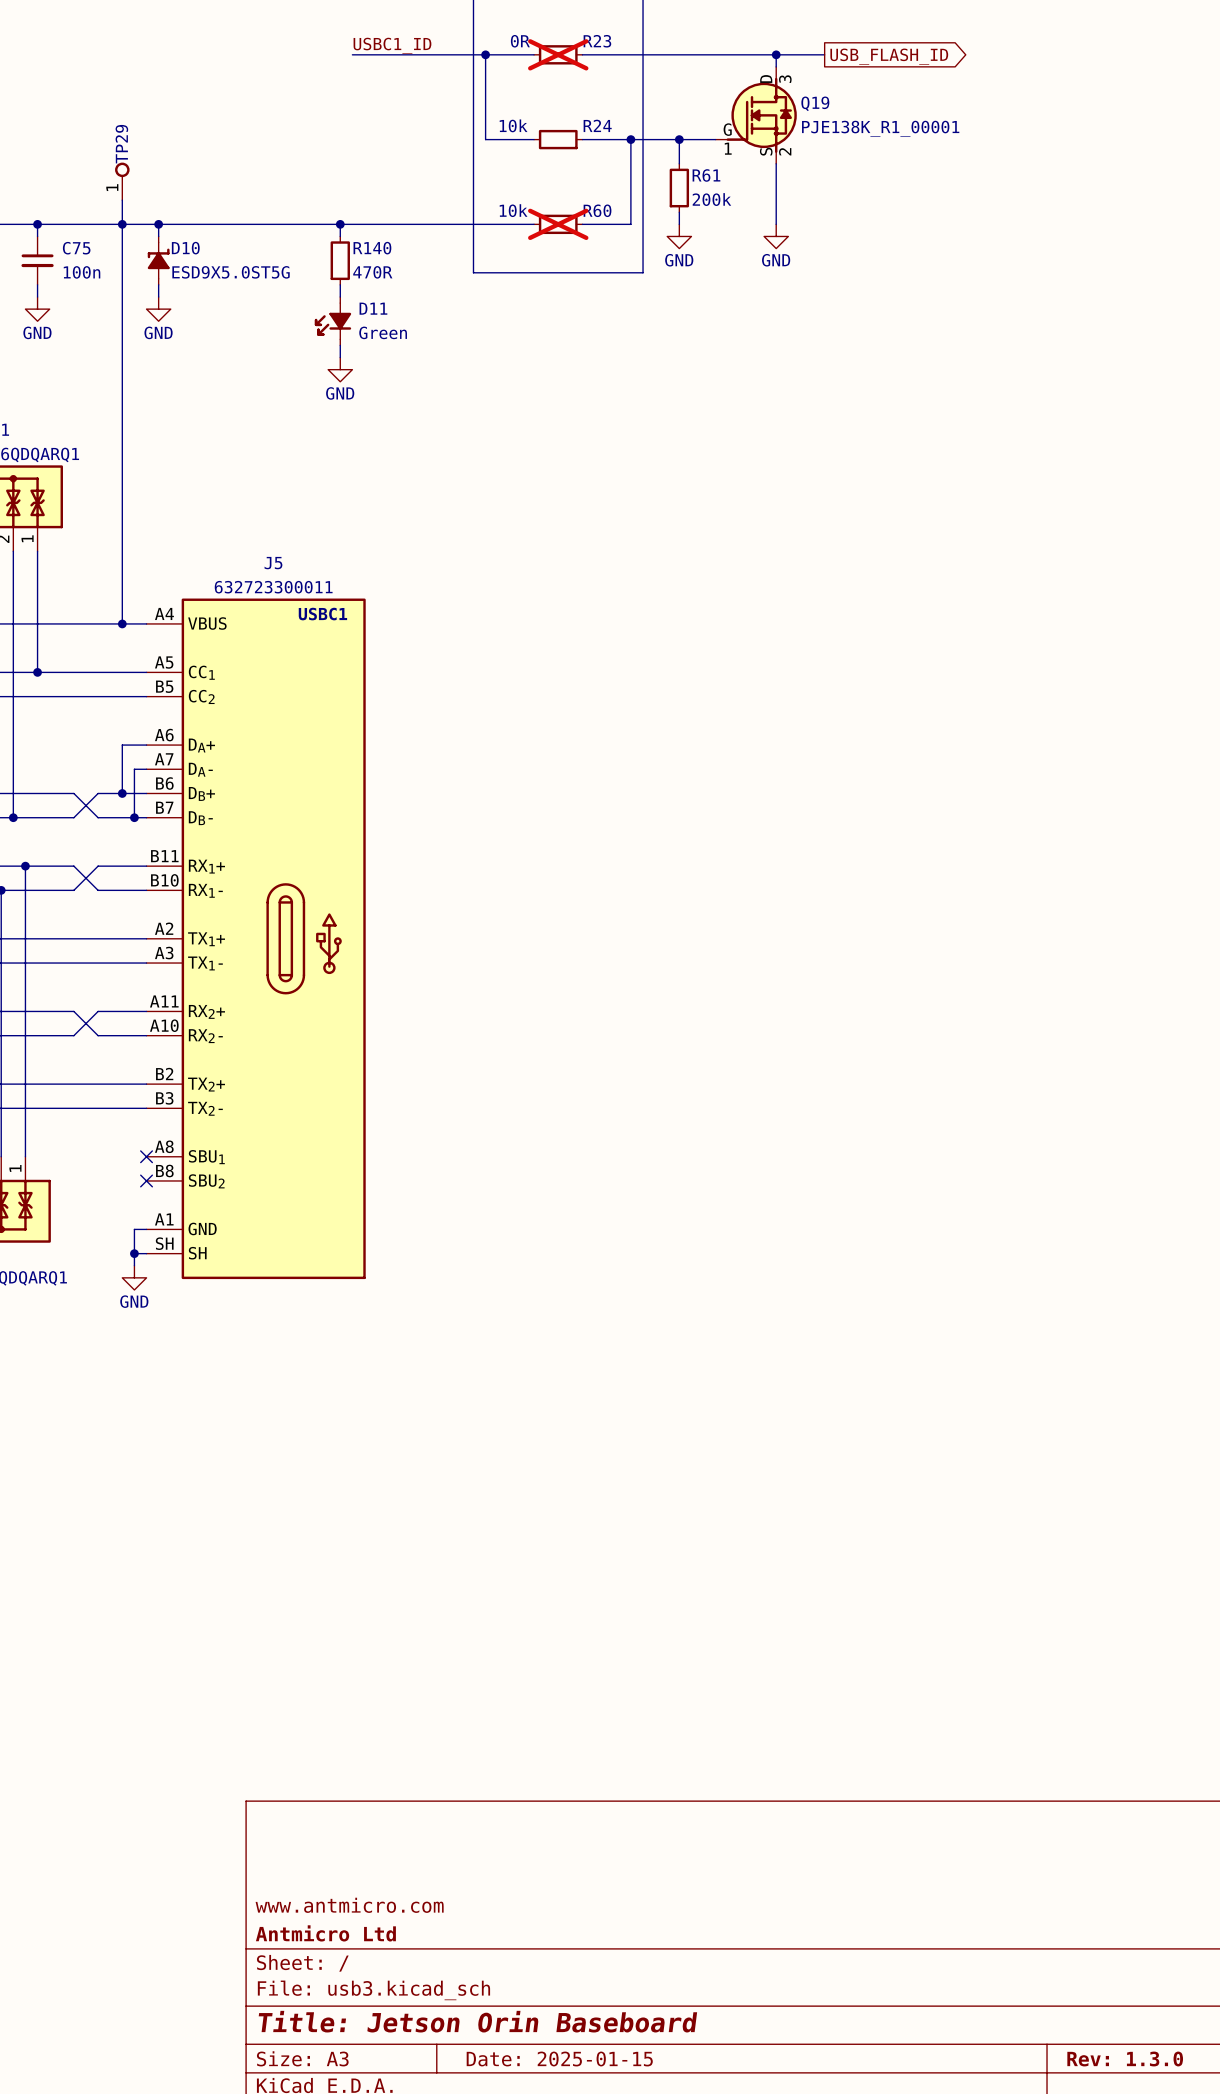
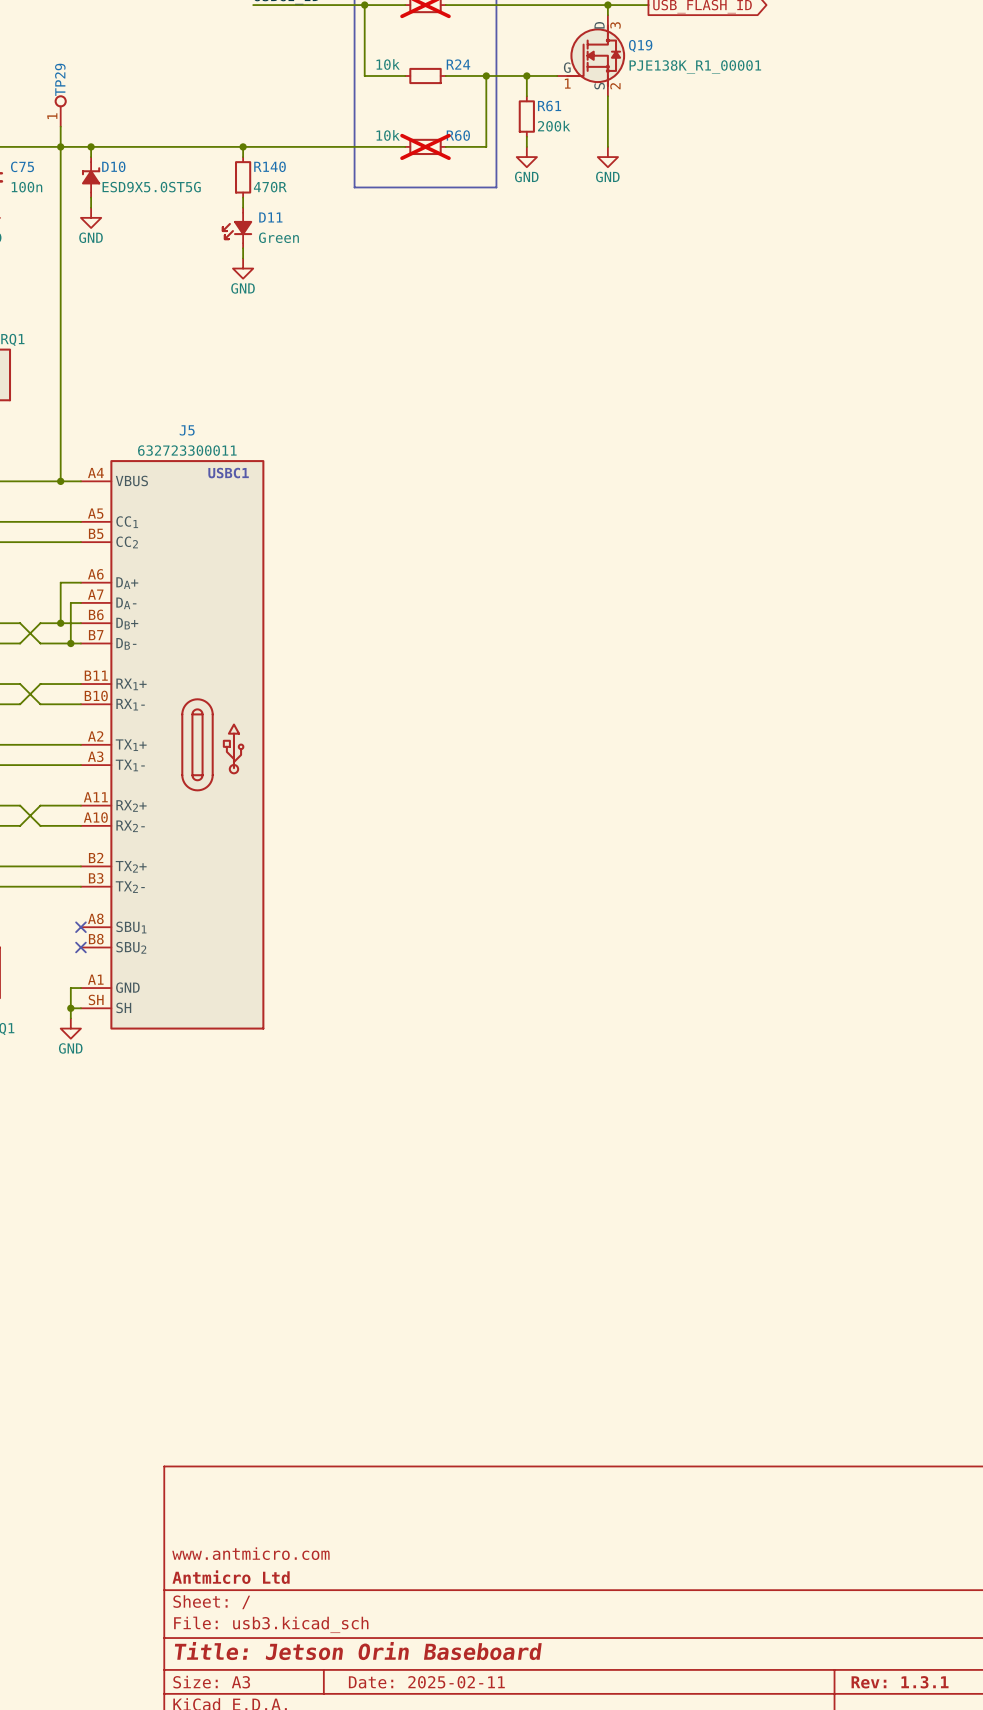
title block: Date: 2025-01-15 (559, 2059) -> Date: 2025-02-11 (426, 1682)
title block: Rev: 1.3.0 (1125, 2059) -> Rev: 1.3.1 (900, 1682)

